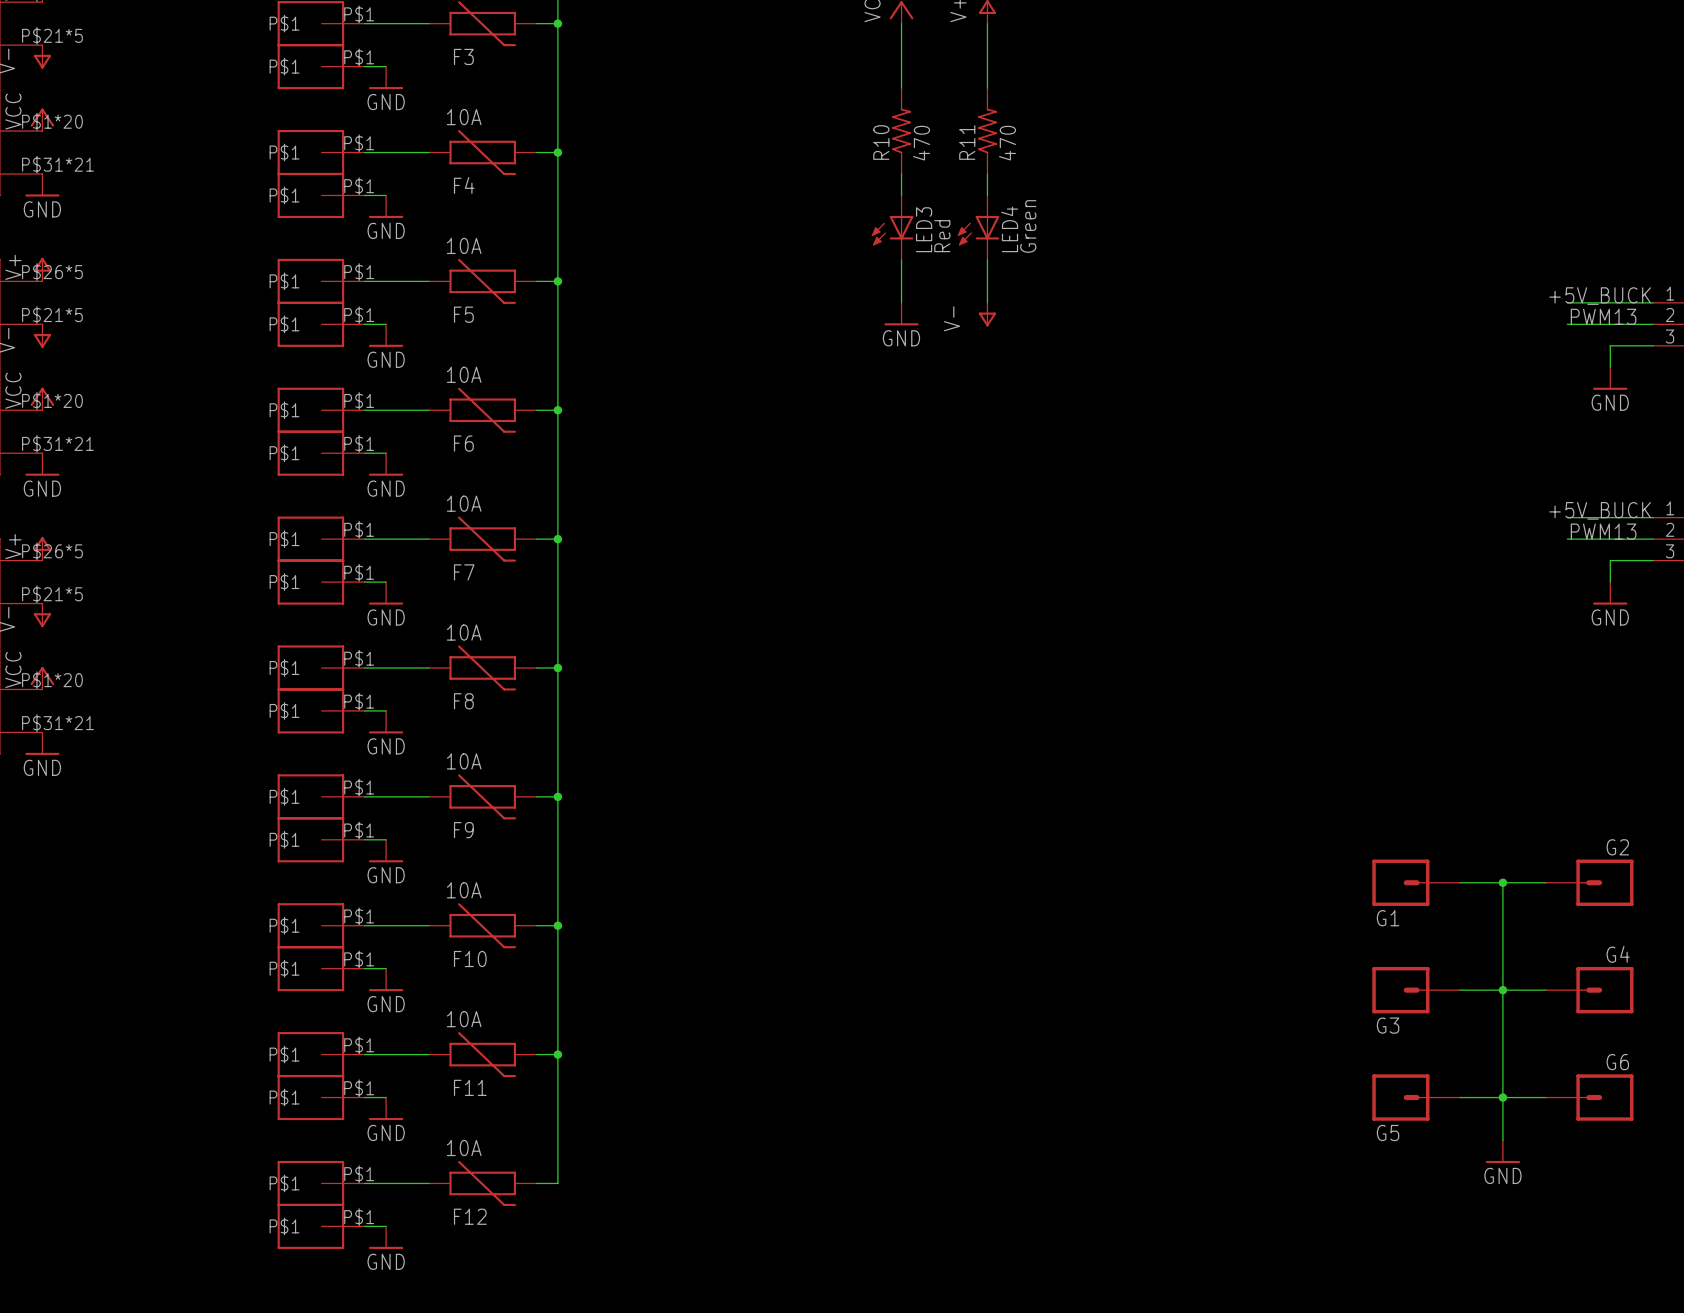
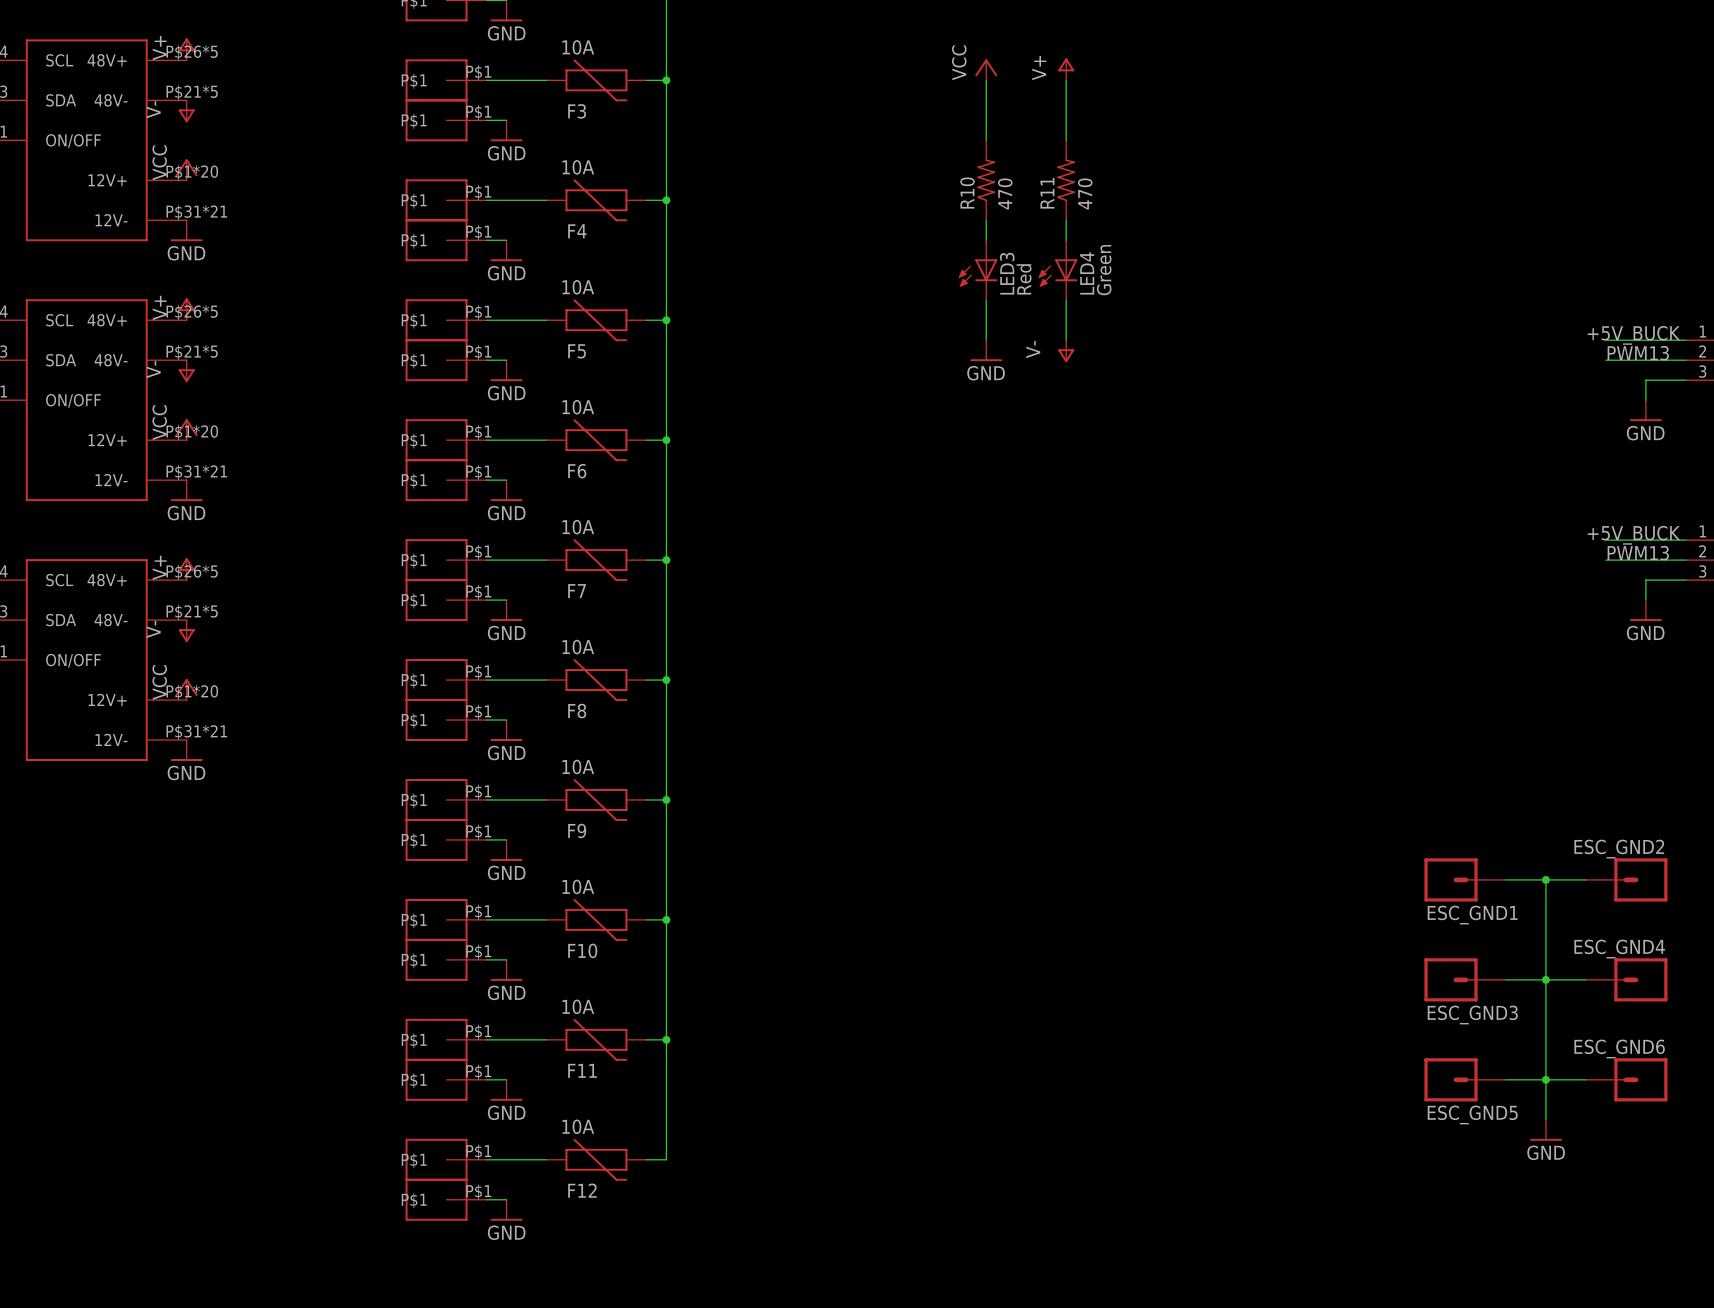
G2 name: G2 (1617, 847) -> ESC_GND2 (1619, 849)
G1 name: G1 (1388, 918) -> ESC_GND1 (1472, 915)
G4 name: G4 (1618, 954) -> ESC_GND4 (1619, 949)
G3 name: G3 (1388, 1025) -> ESC_GND3 (1472, 1015)
G6 name: G6 (1617, 1062) -> ESC_GND6 (1619, 1048)
G5 name: G5 (1388, 1132) -> ESC_GND5 (1472, 1114)

